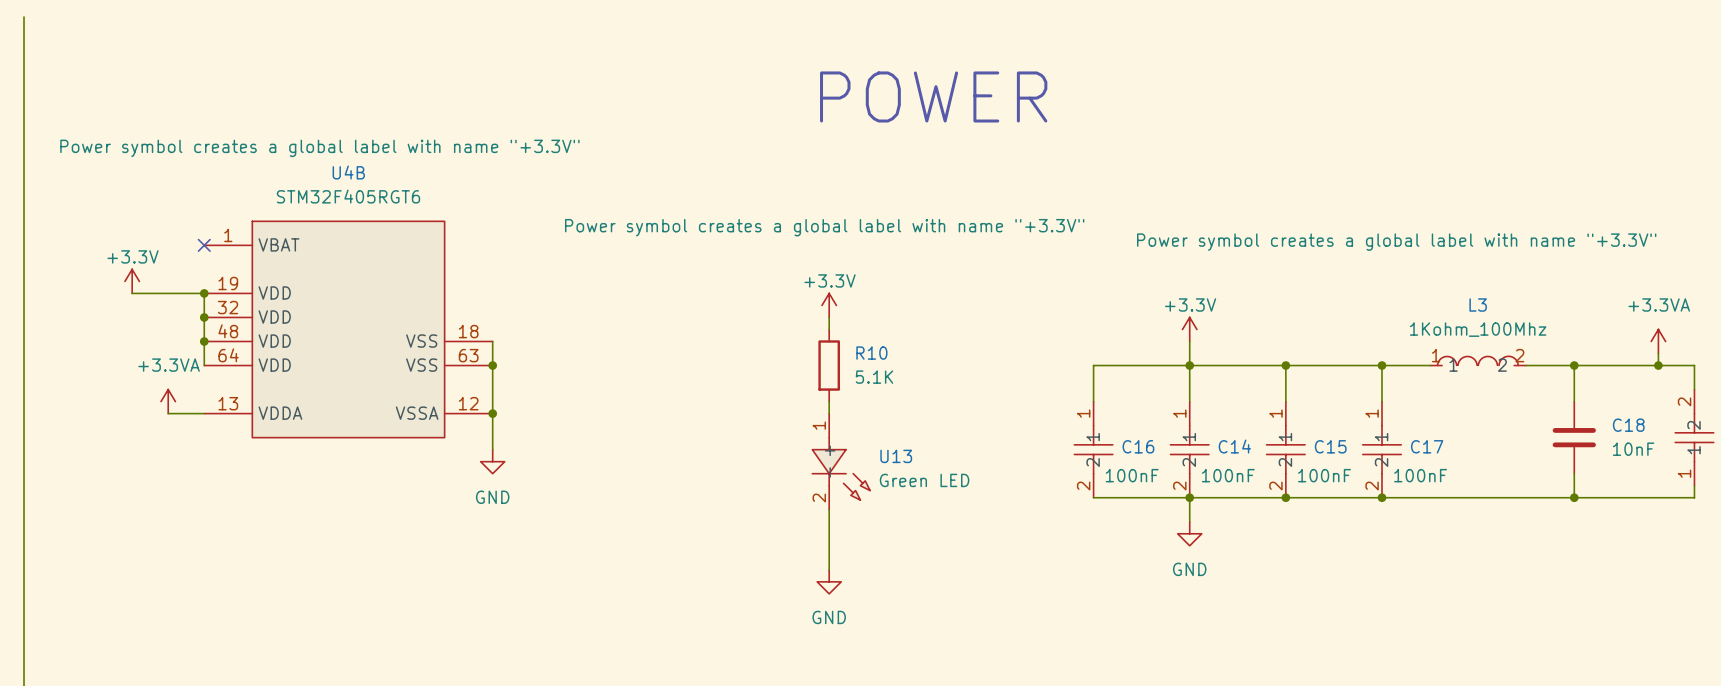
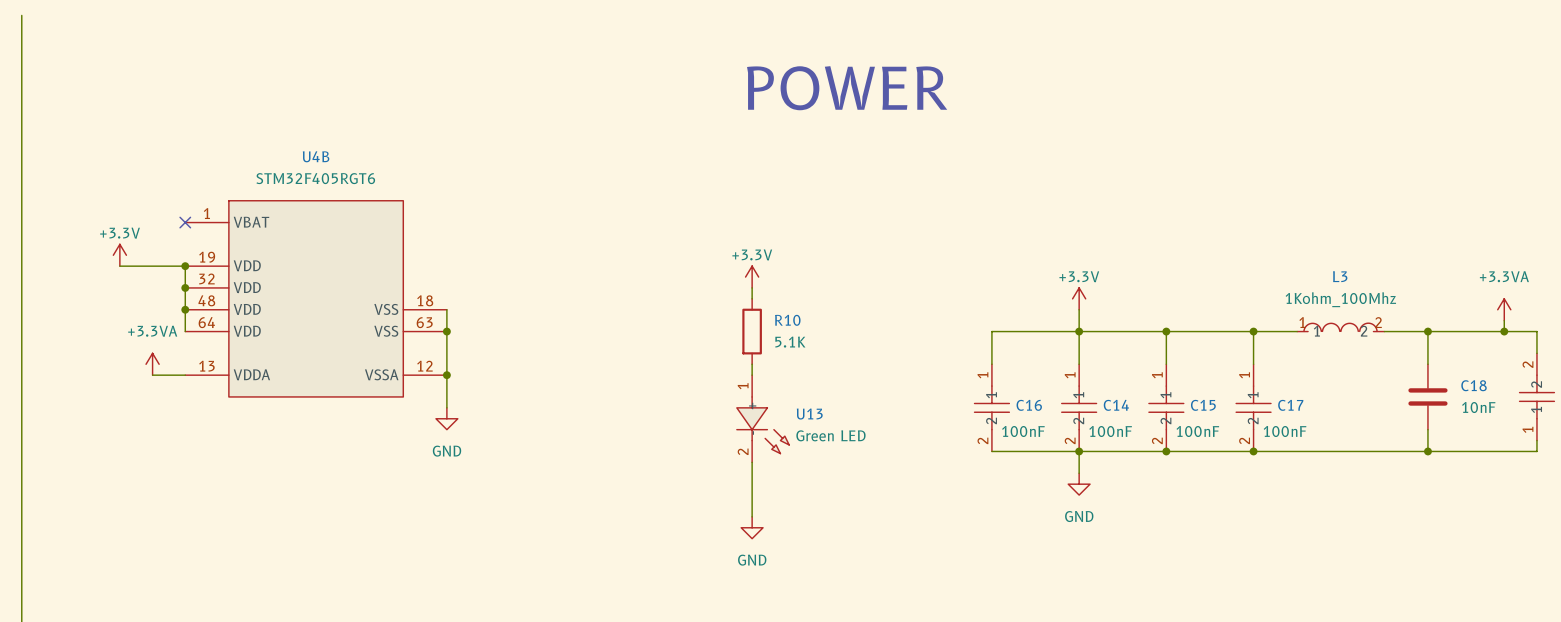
power symbol text: Power symbol creates a global label with name "+3.3V" (319, 148) -> none
power symbol text: Power symbol creates a global label with name "+3.3V" (824, 227) -> none
power symbol text: Power symbol creates a global label with name "+3.3V" (1396, 242) -> none

